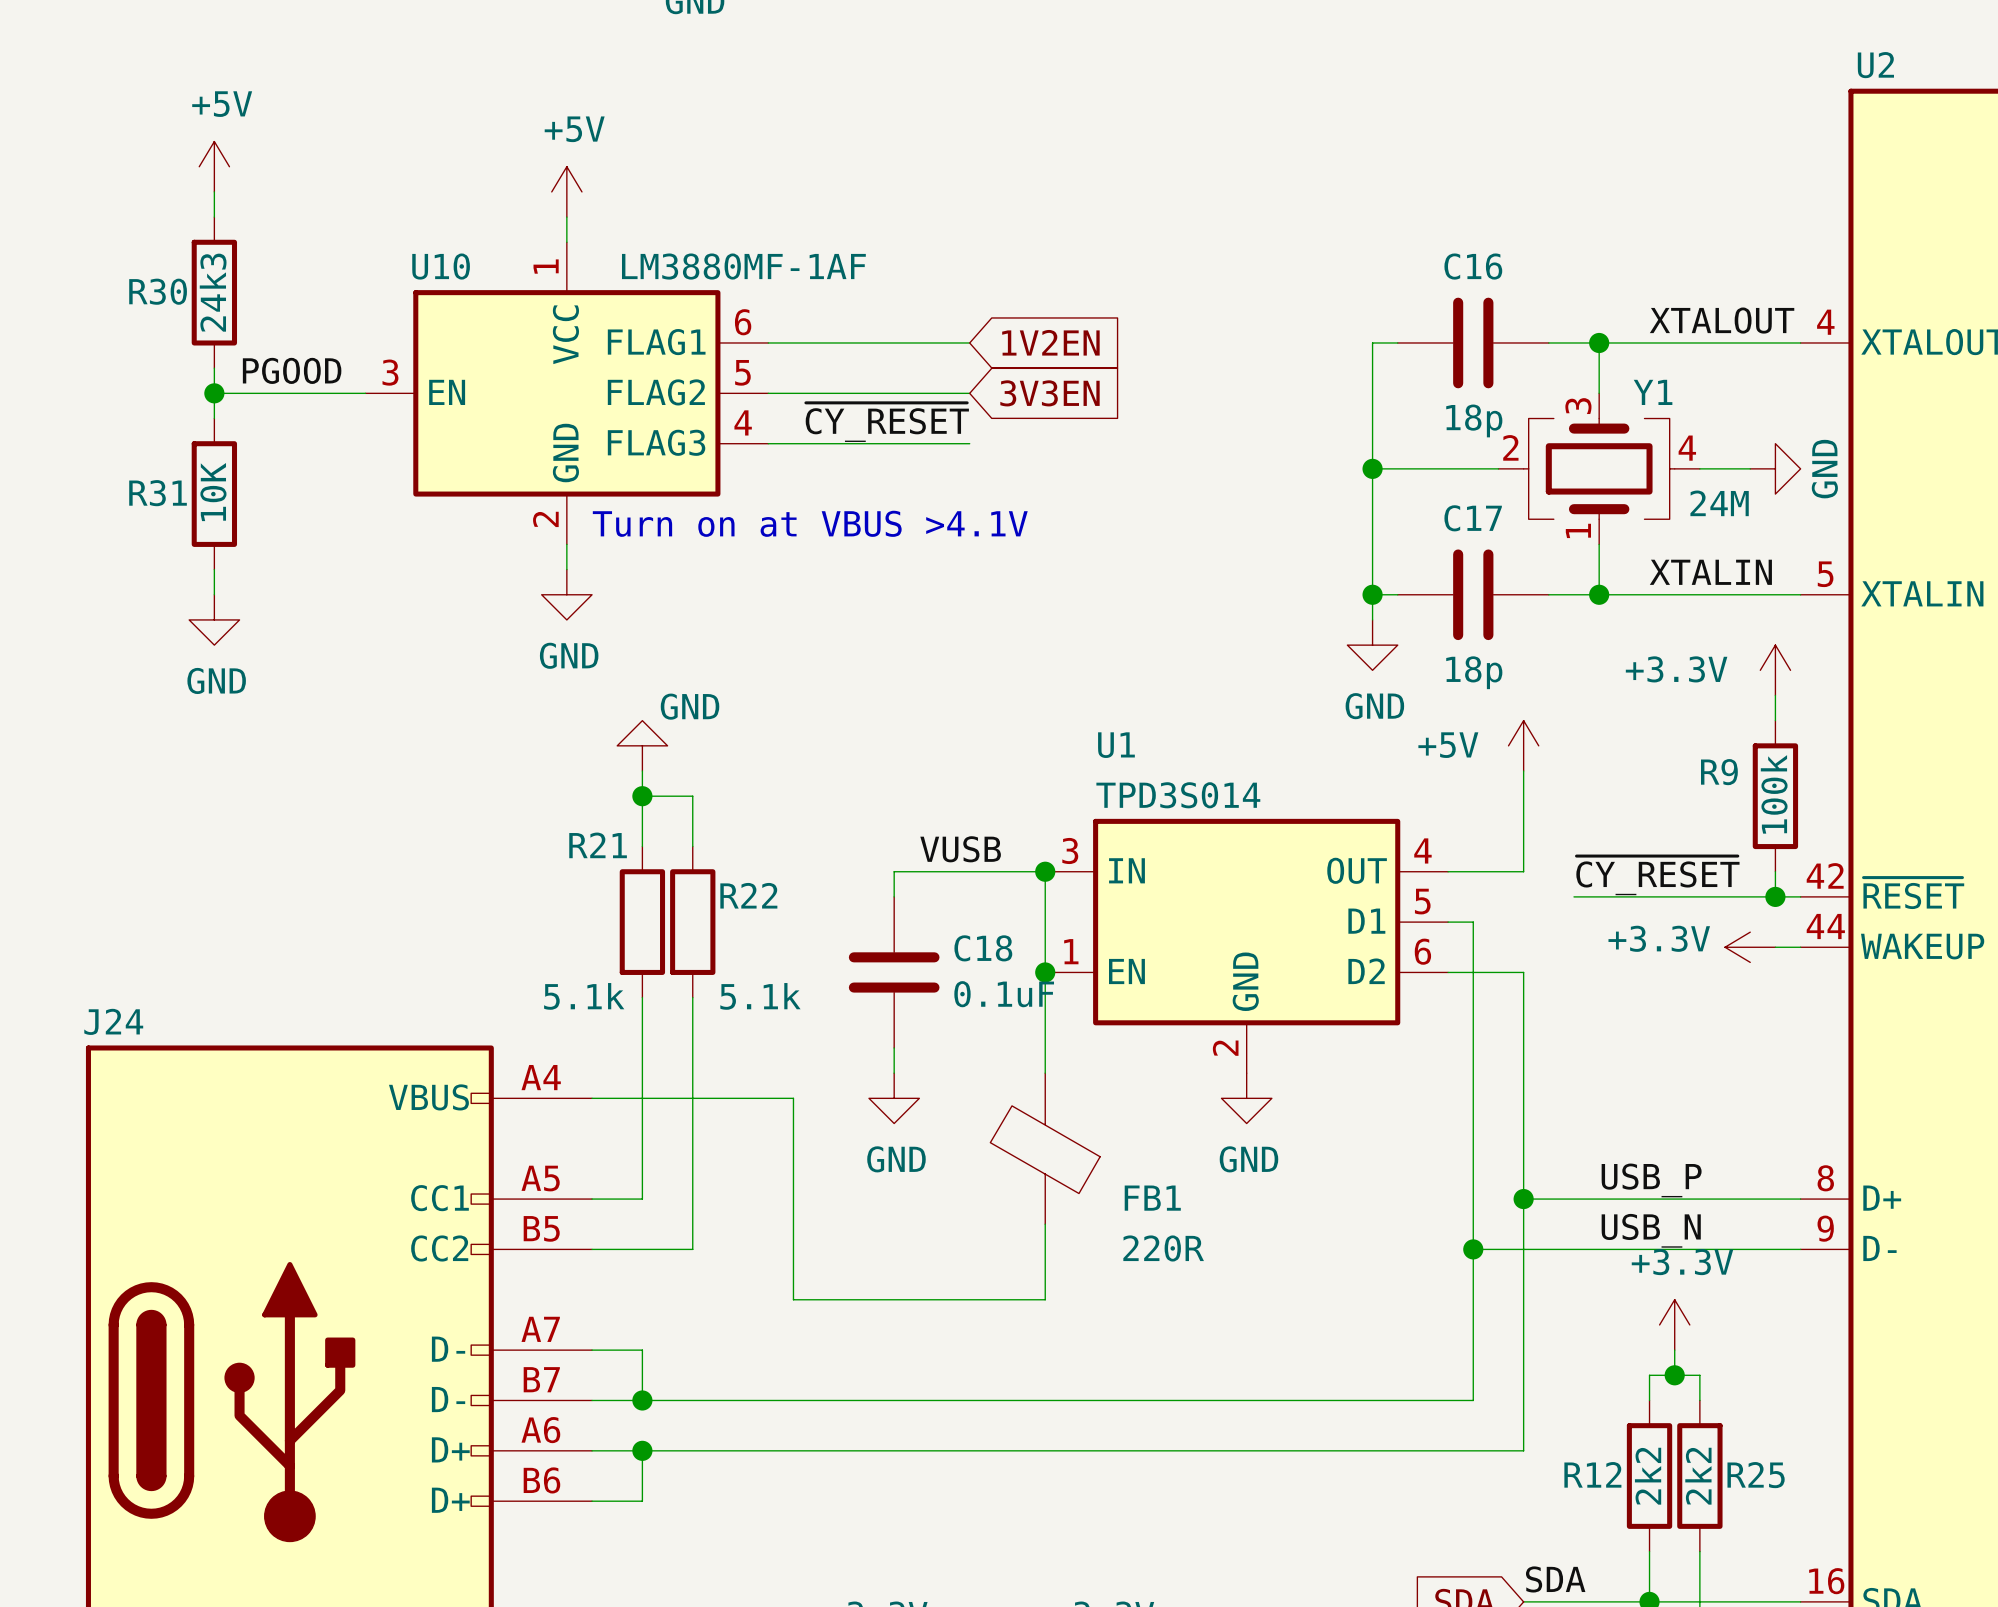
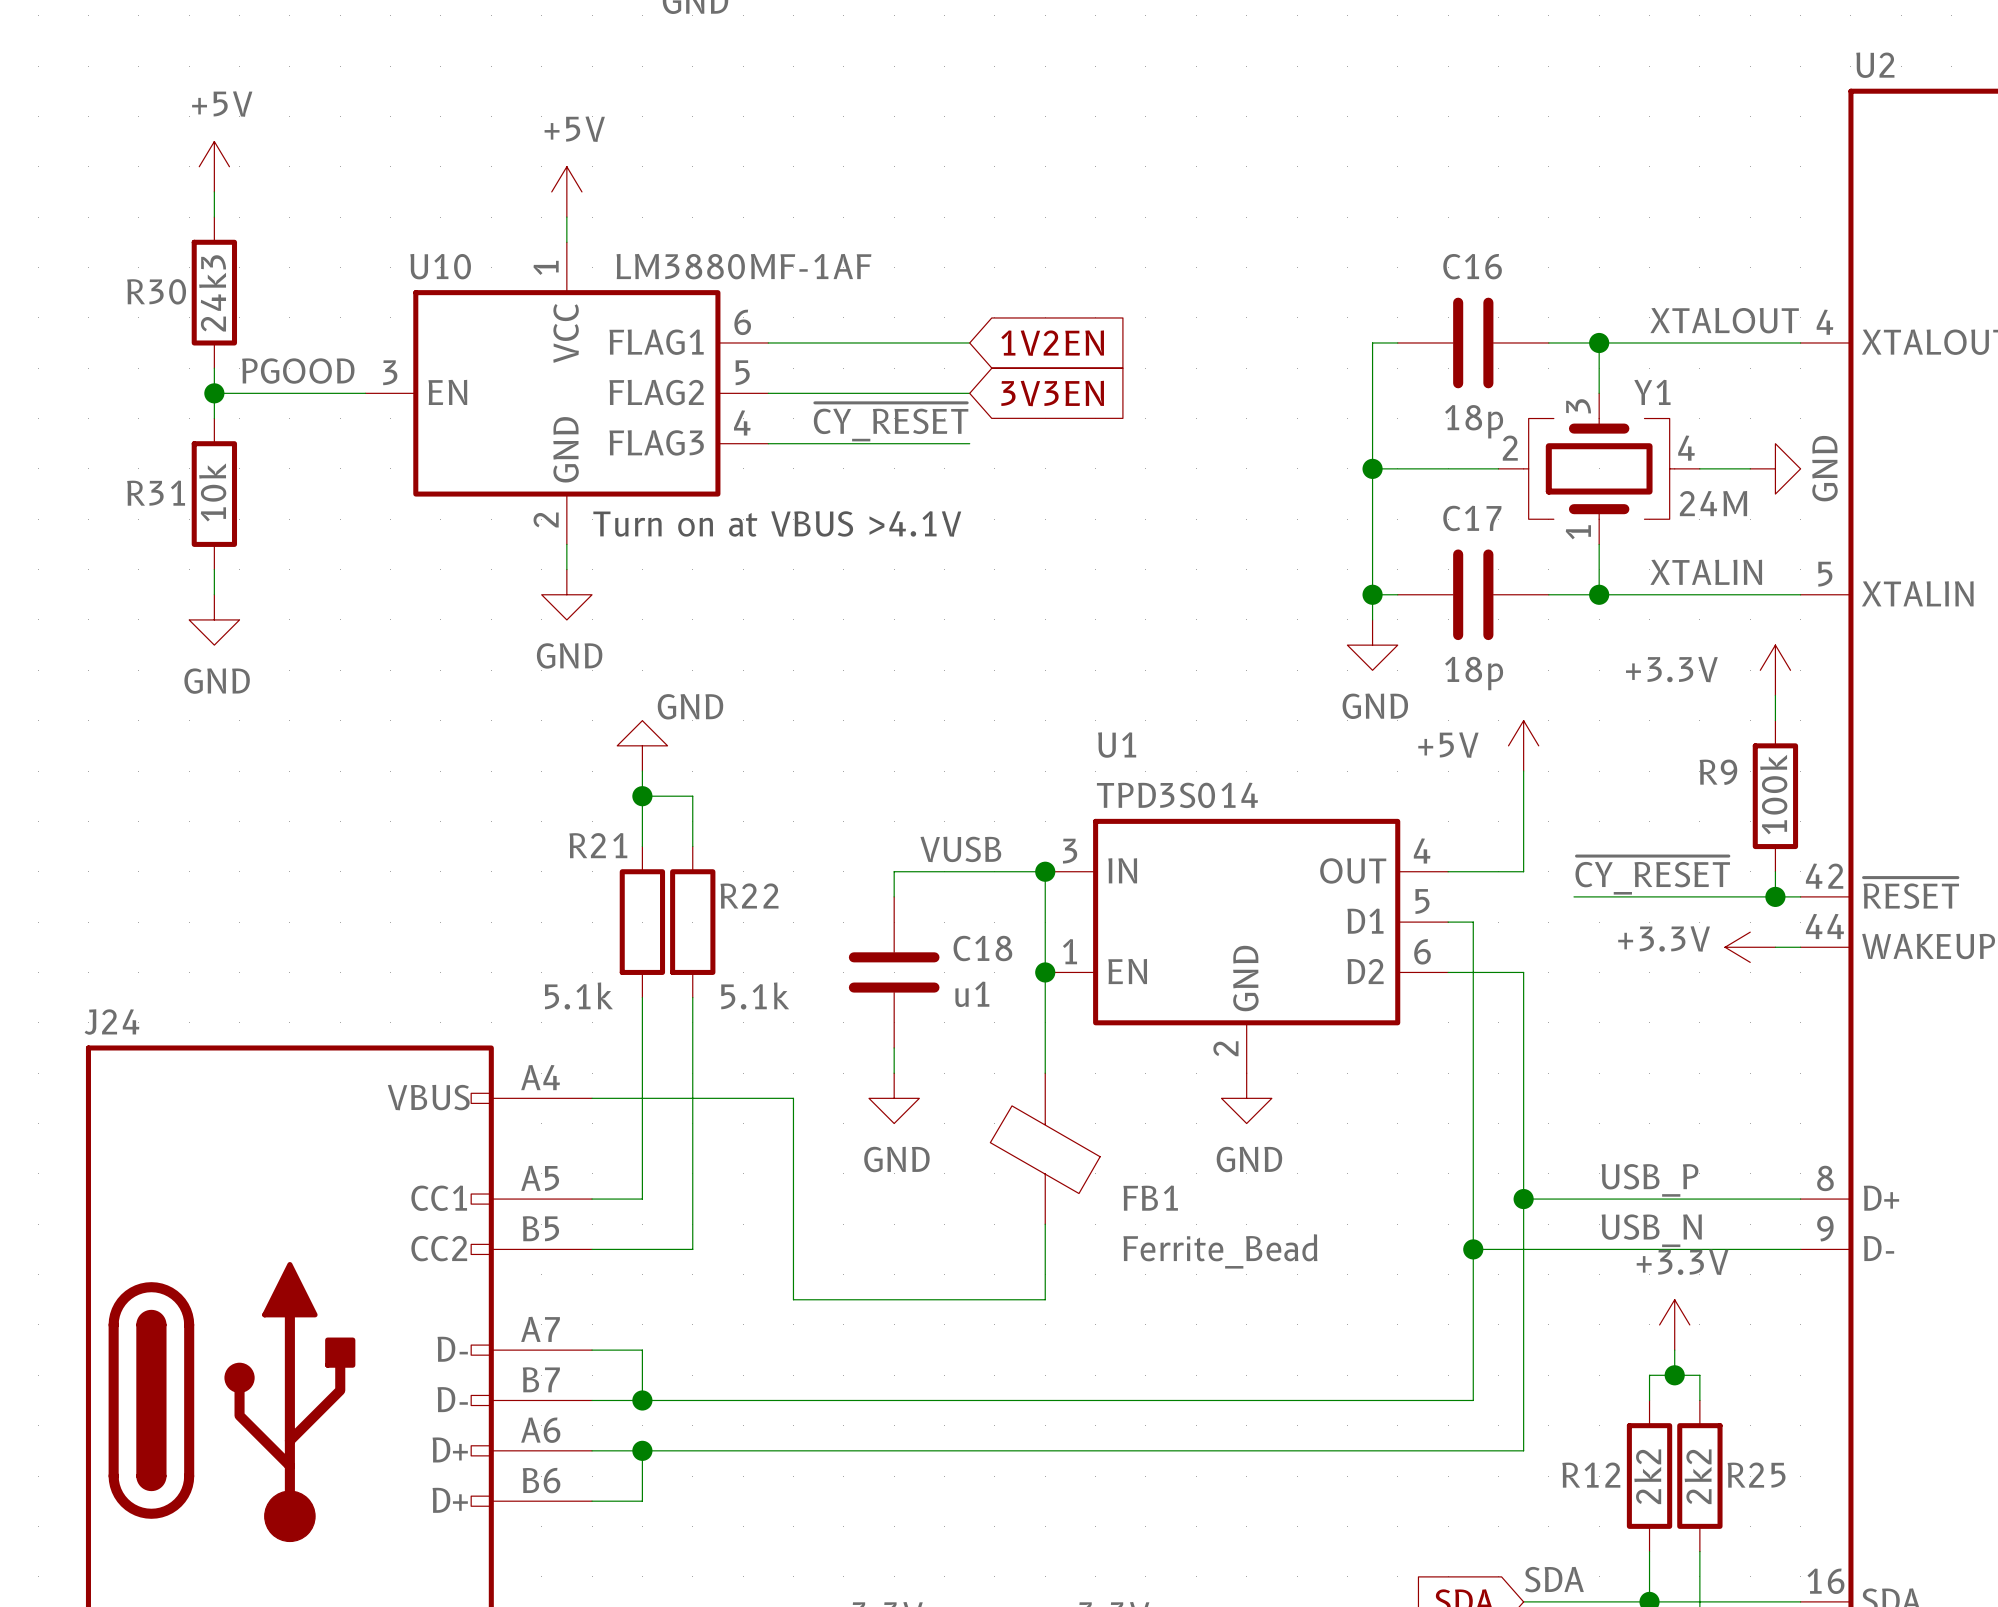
R31 value: 10K (213, 492) -> 10k (212, 492)
C18 value: 0.1uF (1004, 994) -> u1 (972, 994)
FB1 value: 220R (1163, 1248) -> Ferrite_Bead (1220, 1251)

